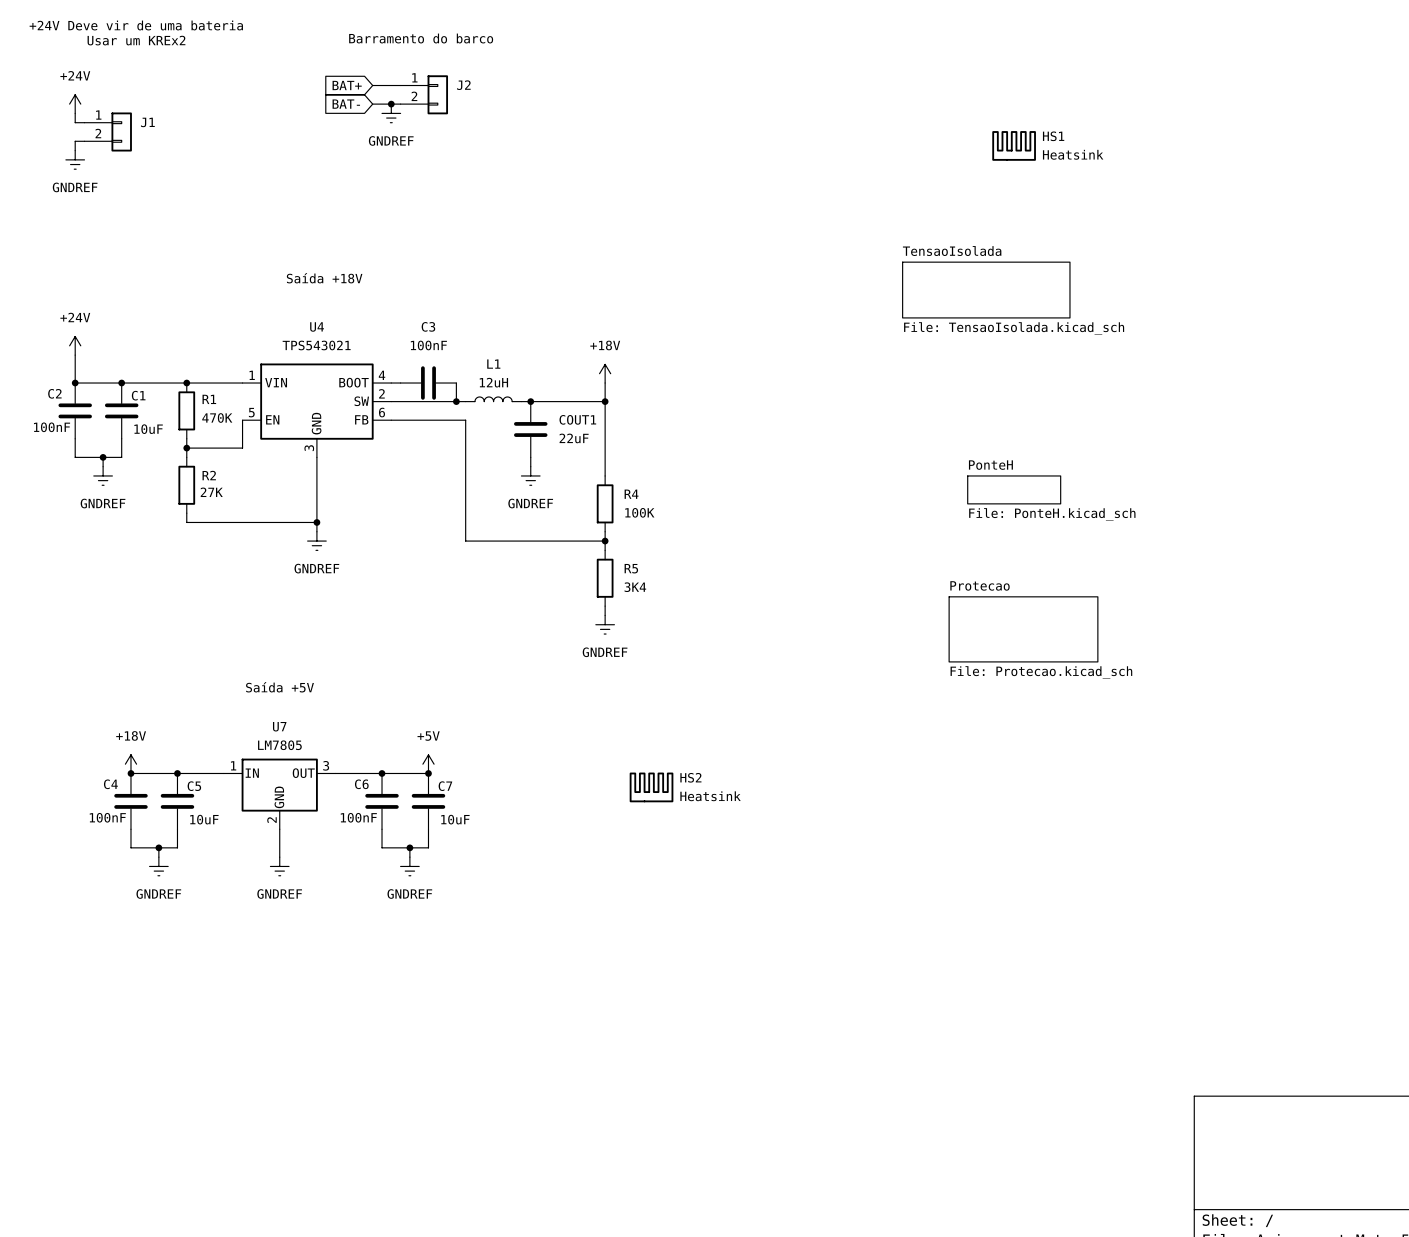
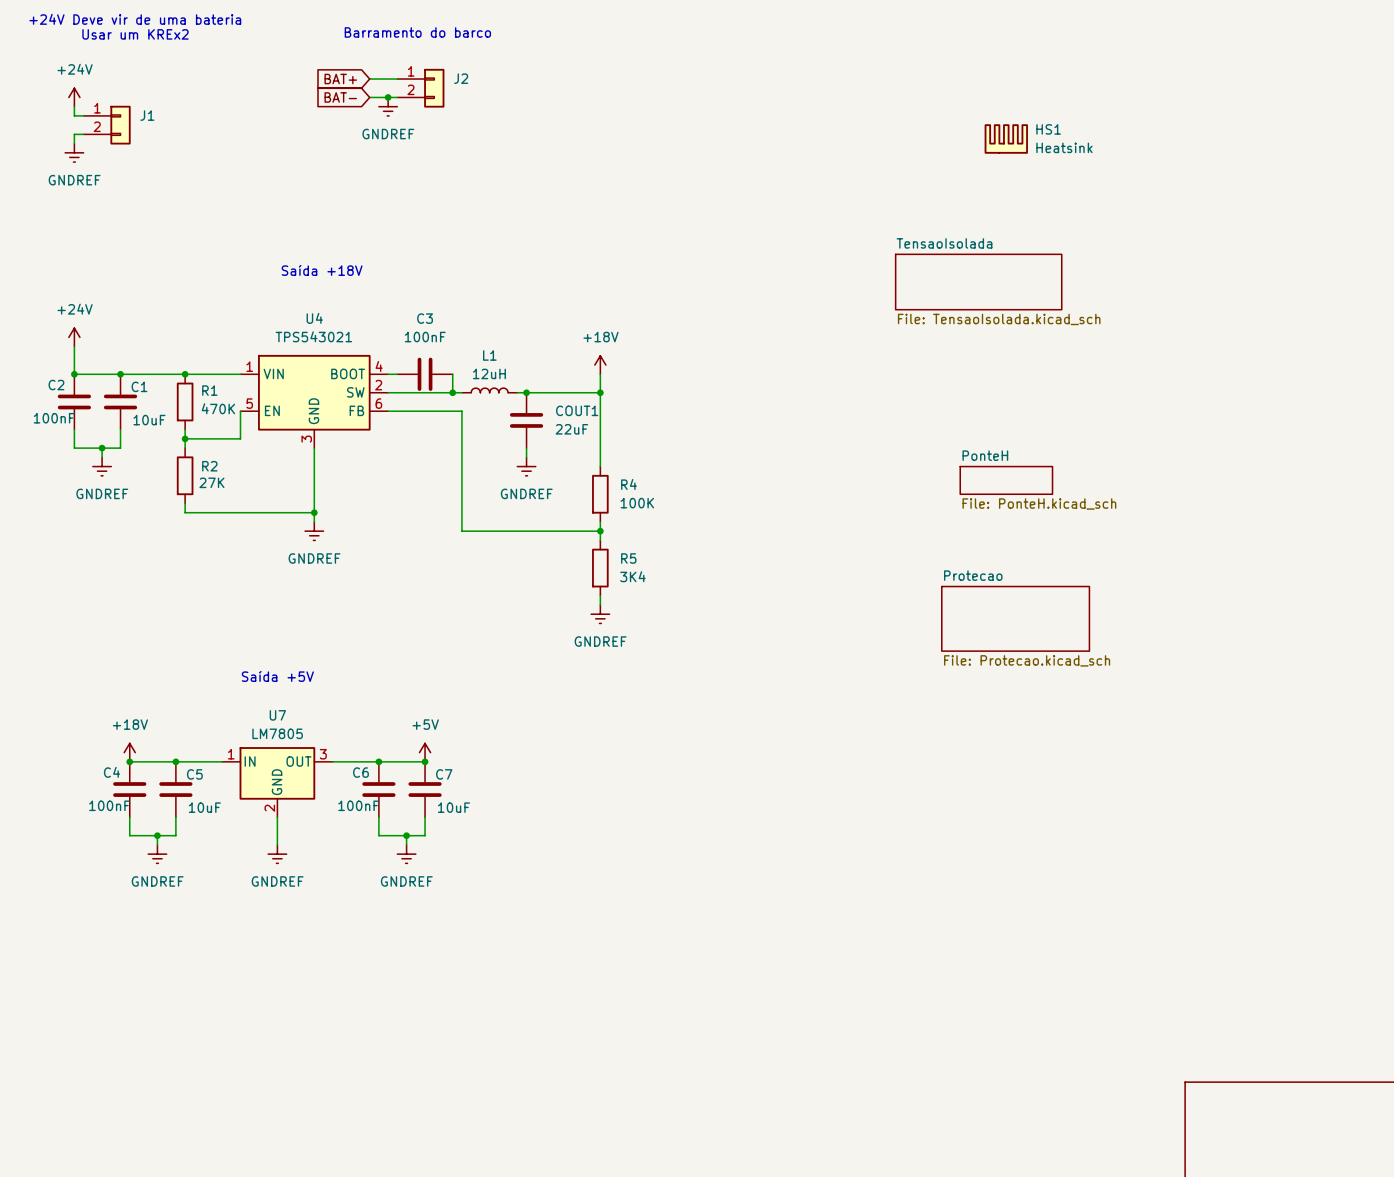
HS2: Heatsink (651, 787) -> none

